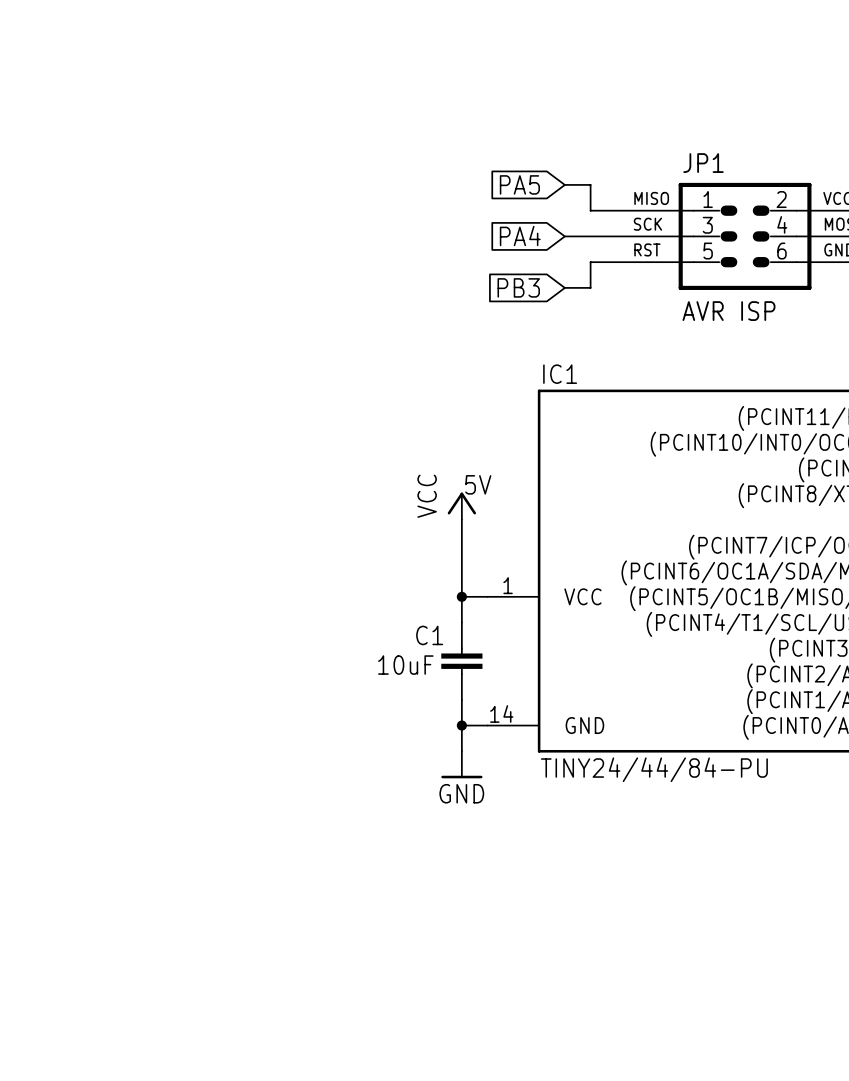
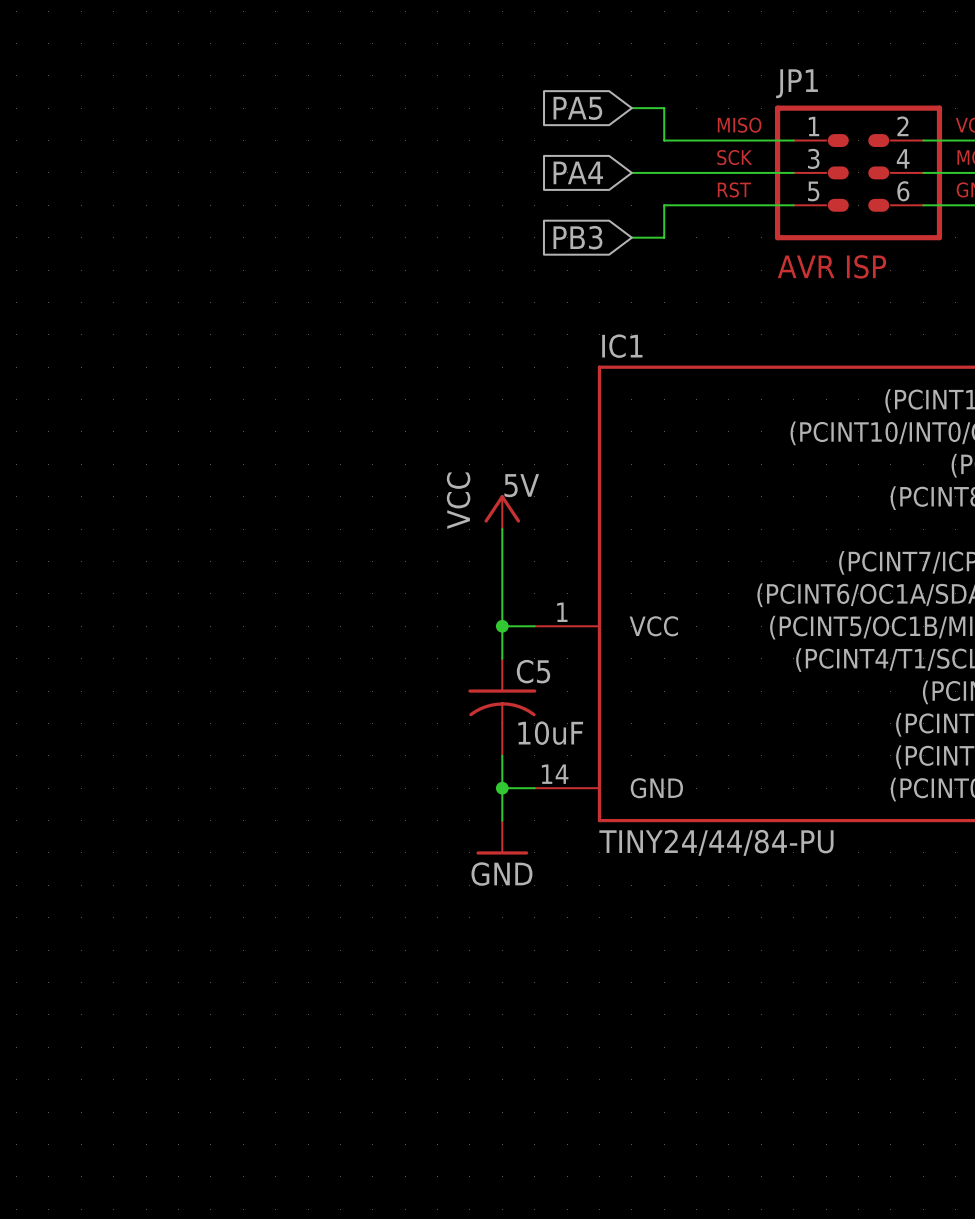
C1: (461, 661) -> none
C5: none -> 10uF (502, 707)

